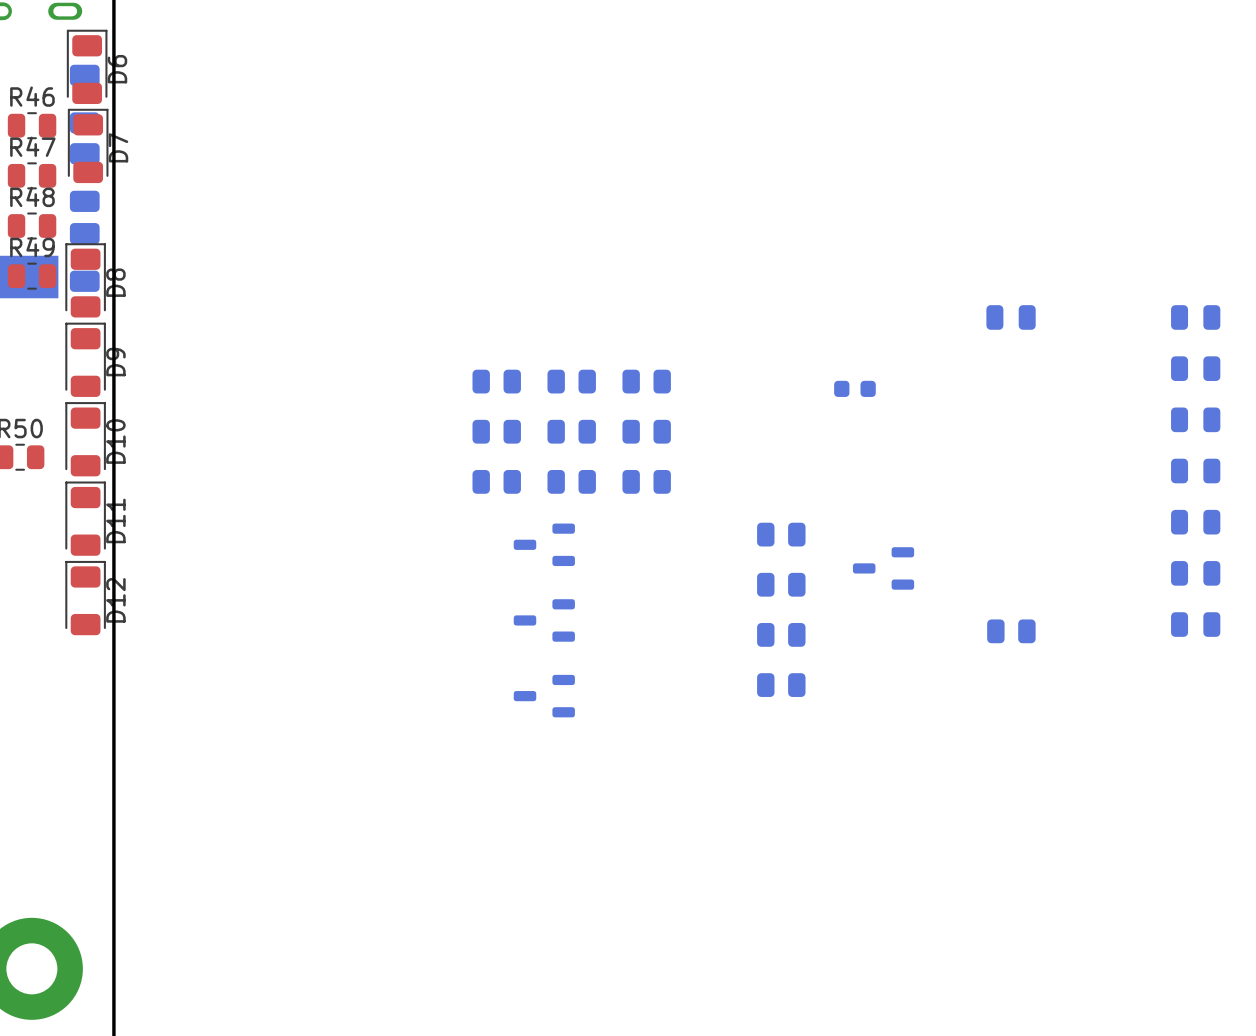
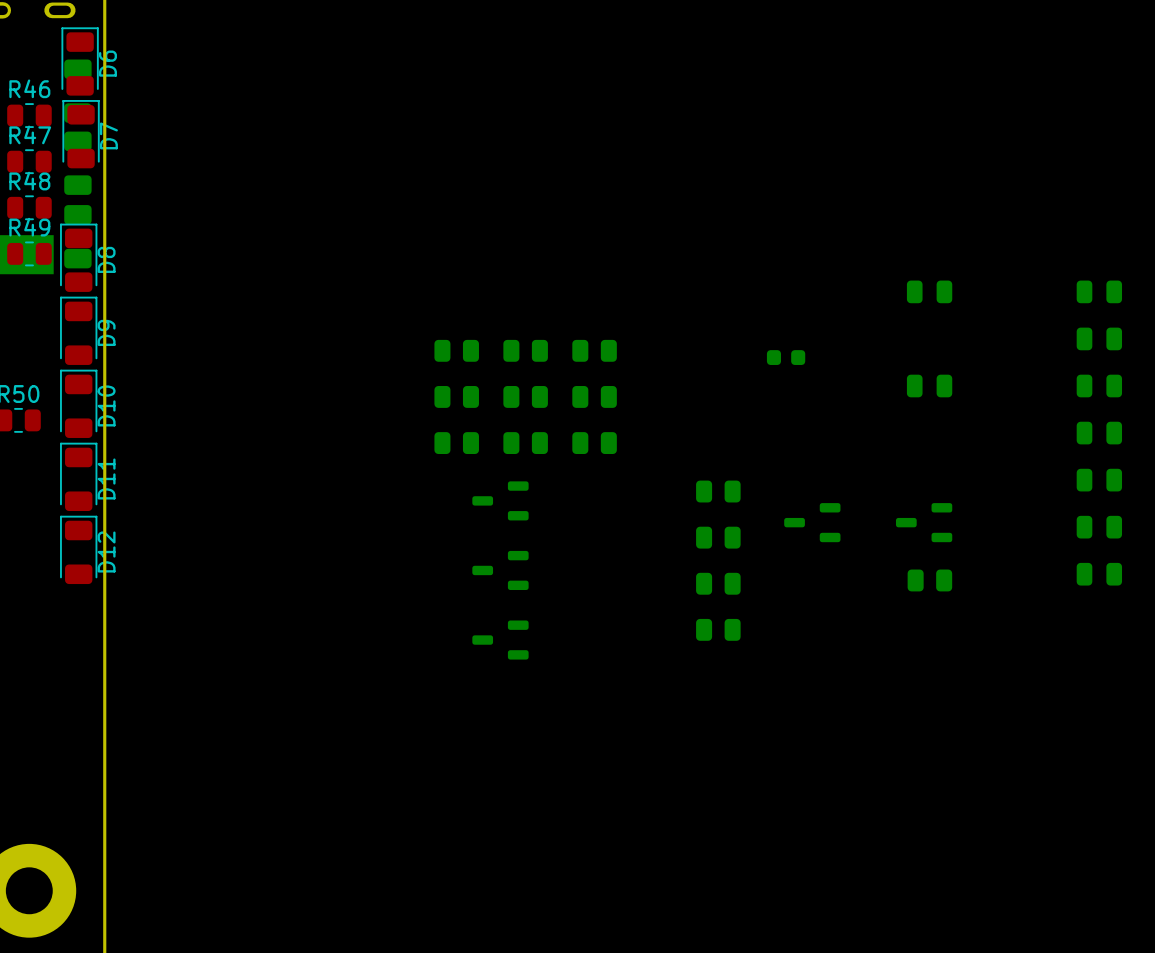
part: none -> (929, 386)
part: none -> (924, 522)

